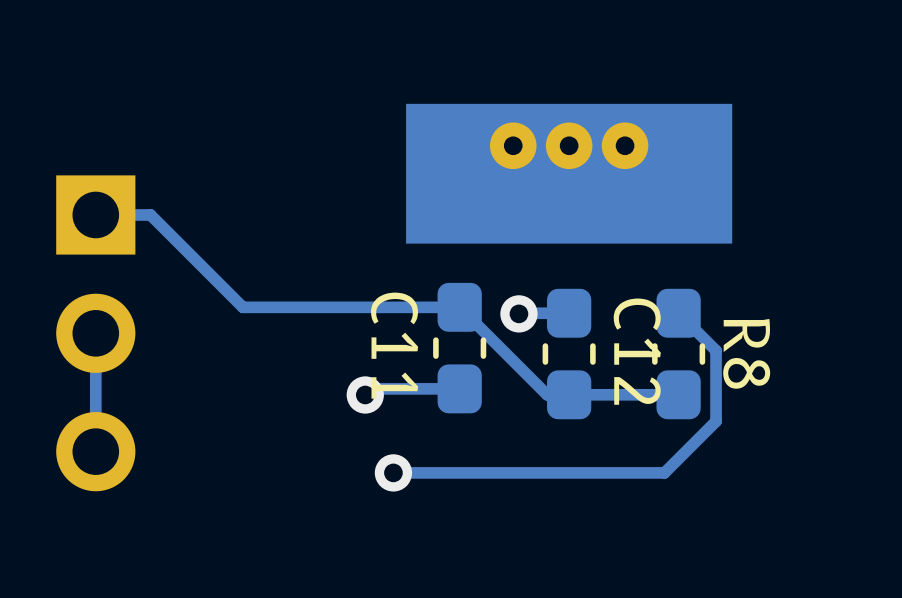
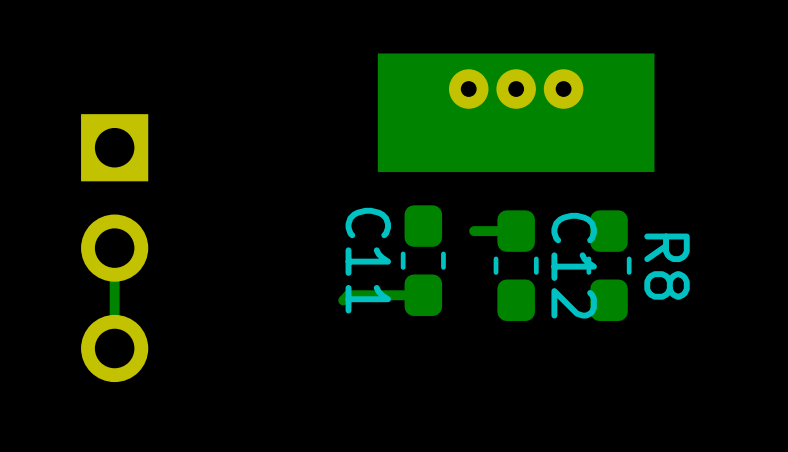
track: (95, 214) (150, 214) (242, 307) (459, 307) (547, 394) (678, 394) -> none
via: (518, 313) -> none
track: (678, 313) (716, 350) (716, 421) (664, 472) (393, 472) -> none
via: (365, 394) -> none
via: (393, 472) -> none

